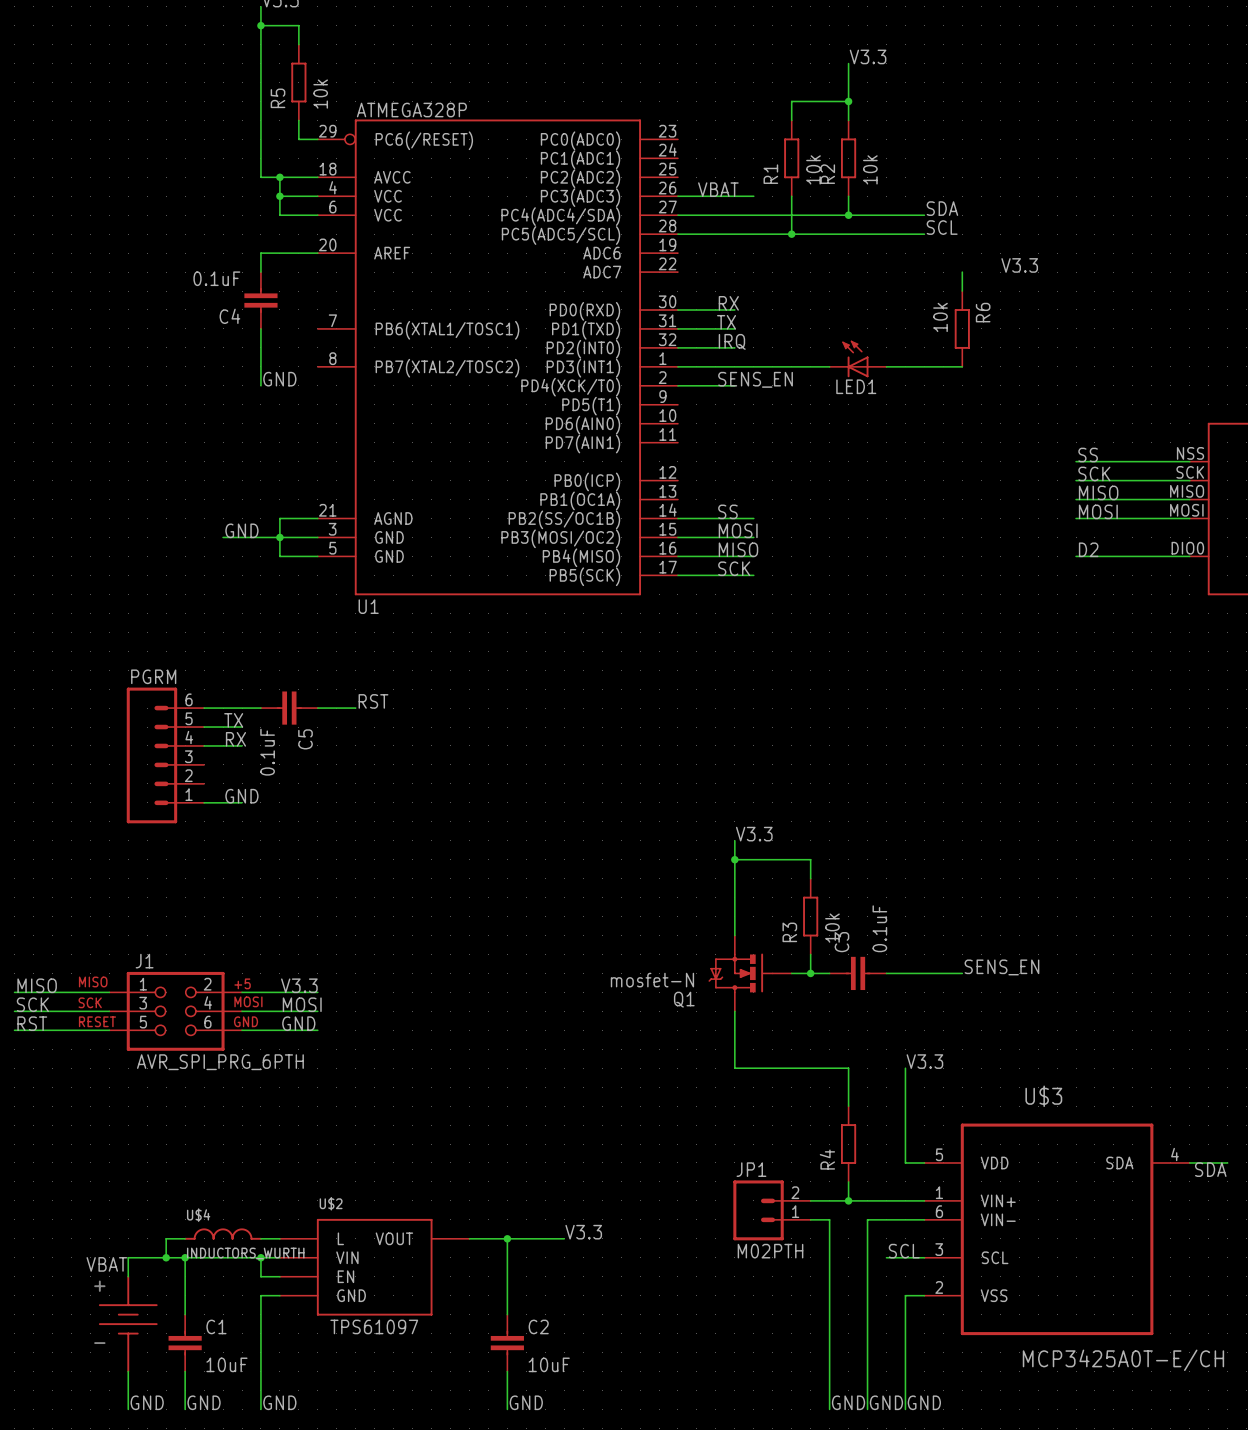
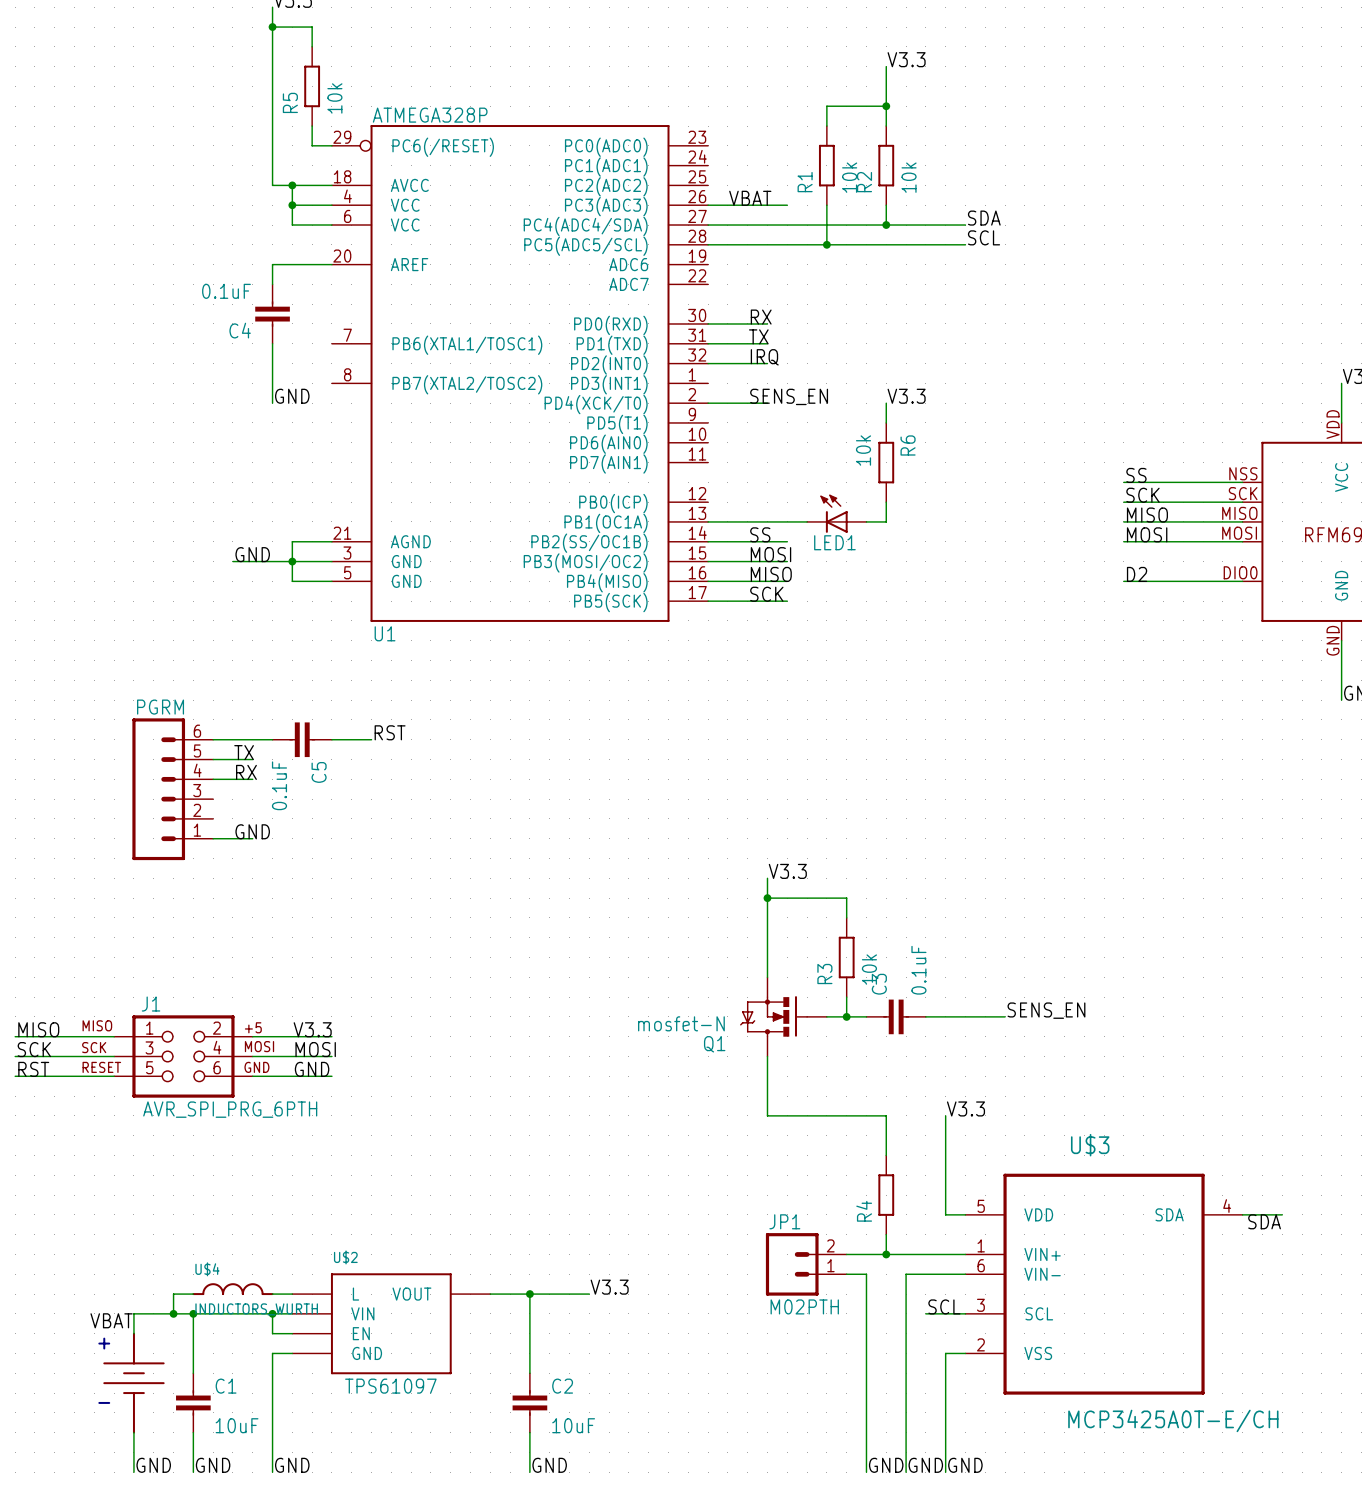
label: V3.3 (1019, 265) -> none
wire: (962, 272) (962, 291) -> (886, 403) (886, 422)
R6 position: (962, 328) -> (886, 462)
LED1 position: (858, 358) -> (836, 513)
wire: (677, 366) (829, 366) -> none
wire: (886, 366) (962, 366) -> none
label: none -> V3.3 (906, 396)
wire: none -> (886, 502) (886, 521) (866, 521)
wire: none -> (708, 521) (807, 521)

